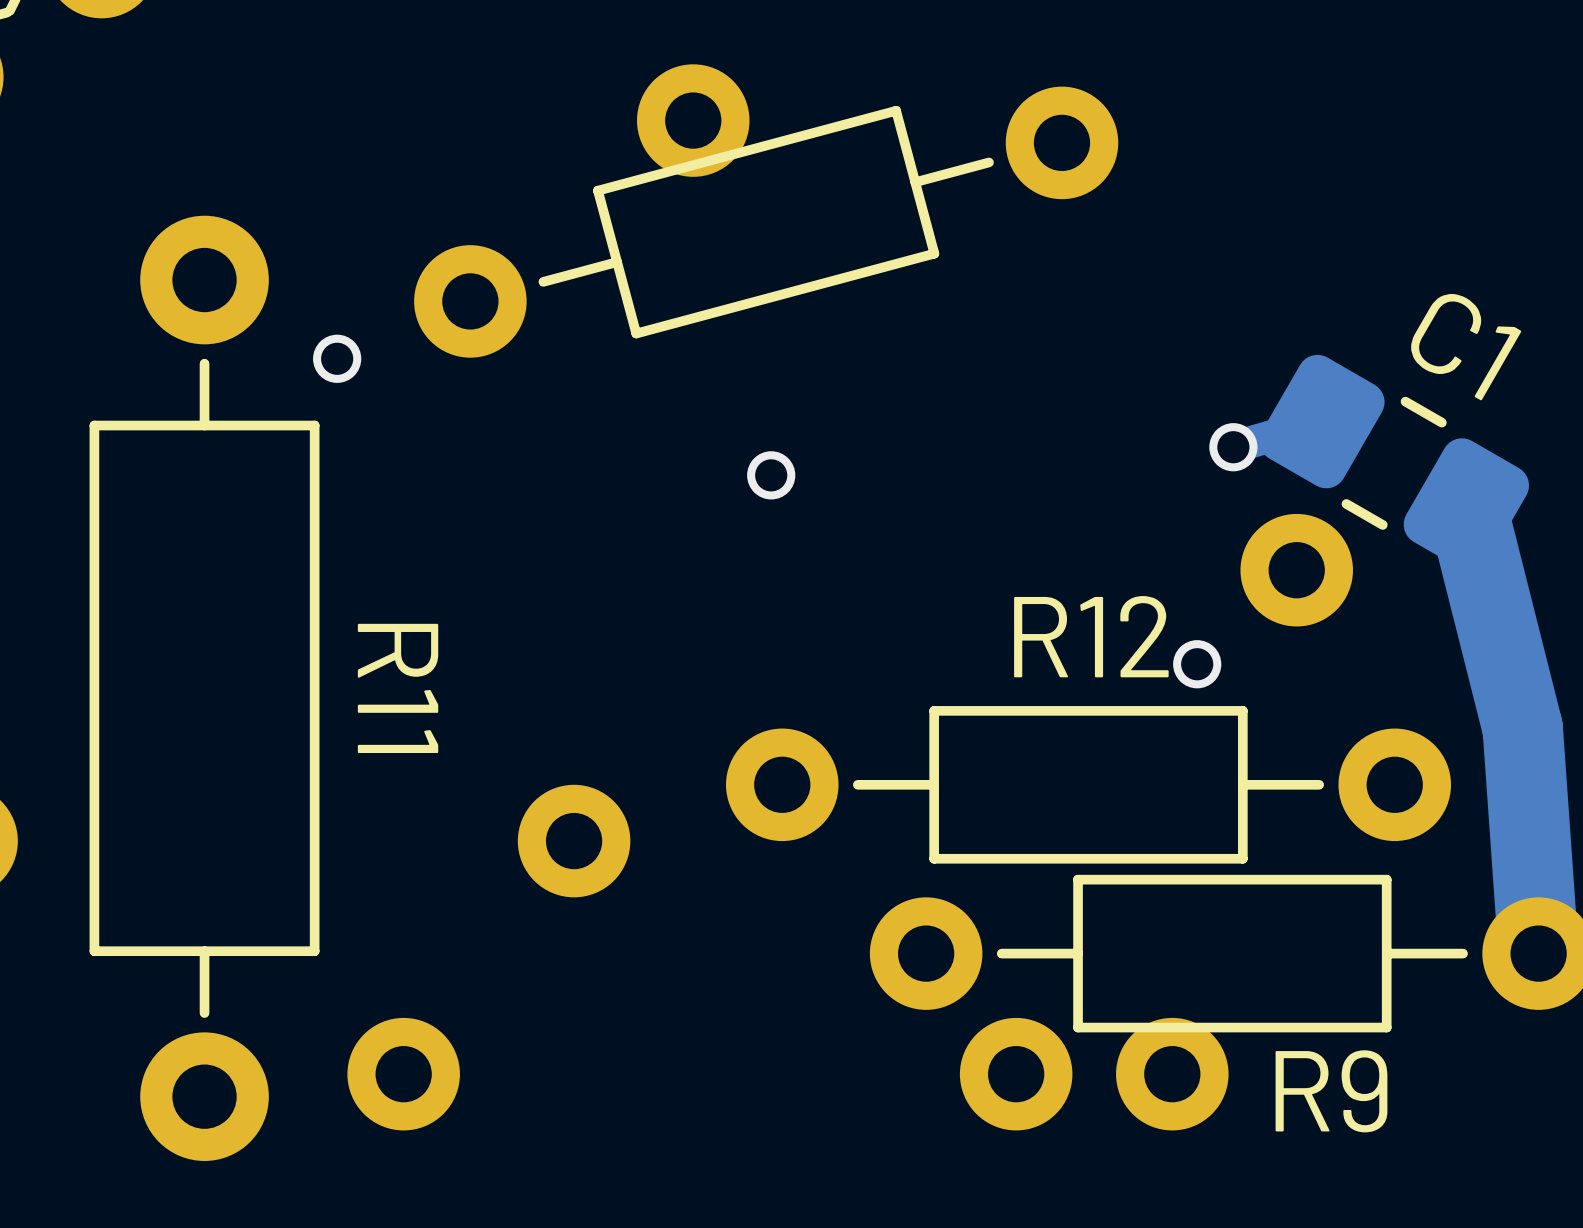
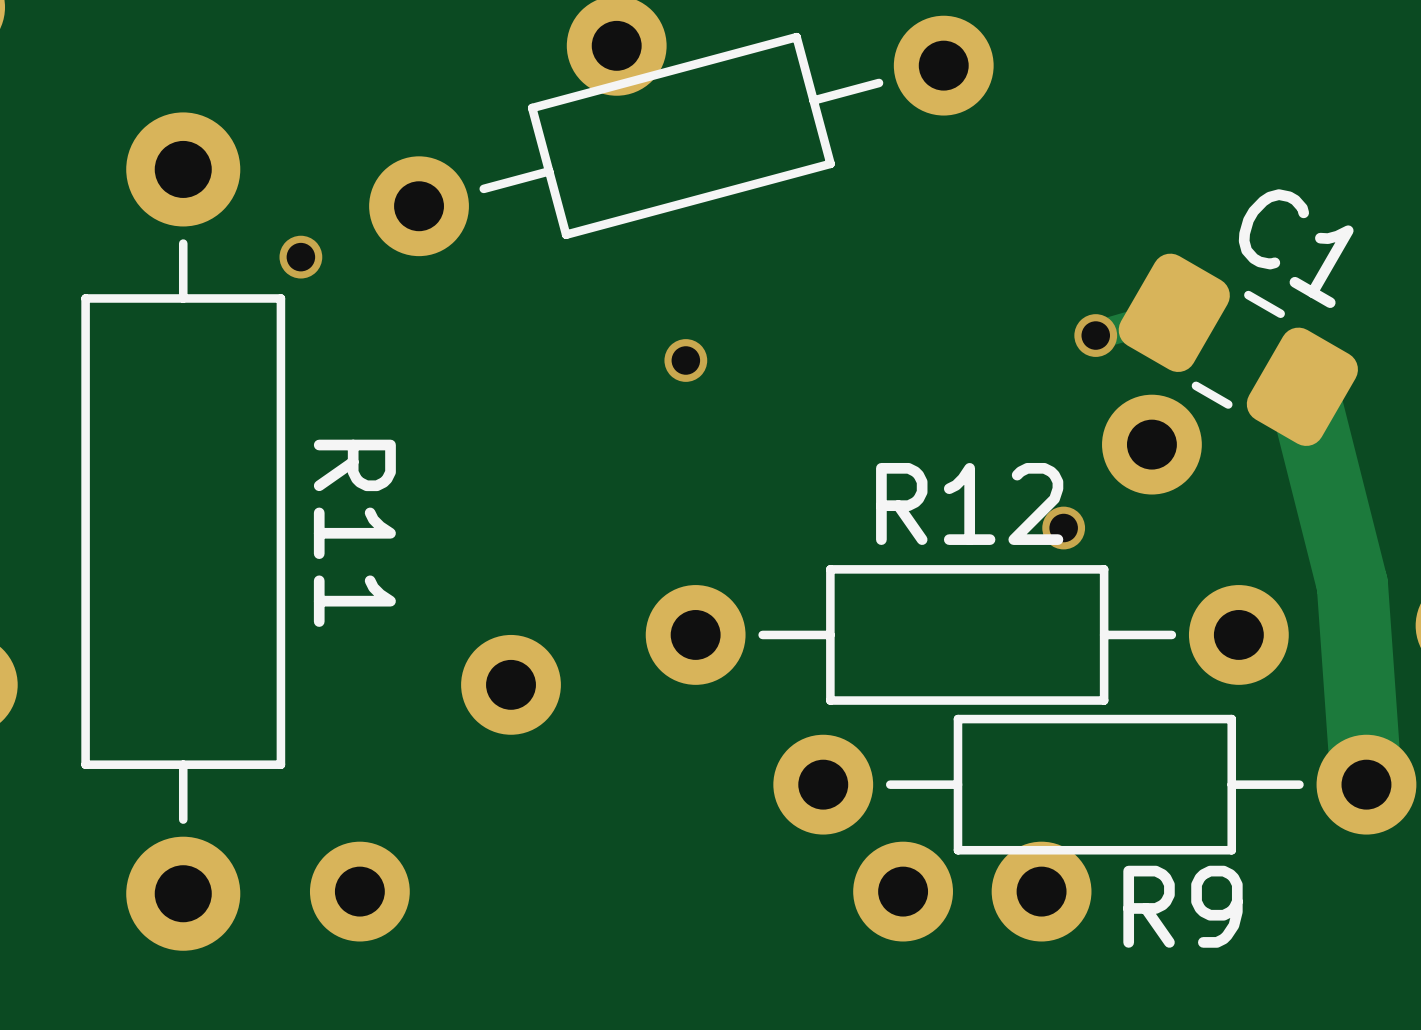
R11 position: (204, 688) -> (183, 531)

